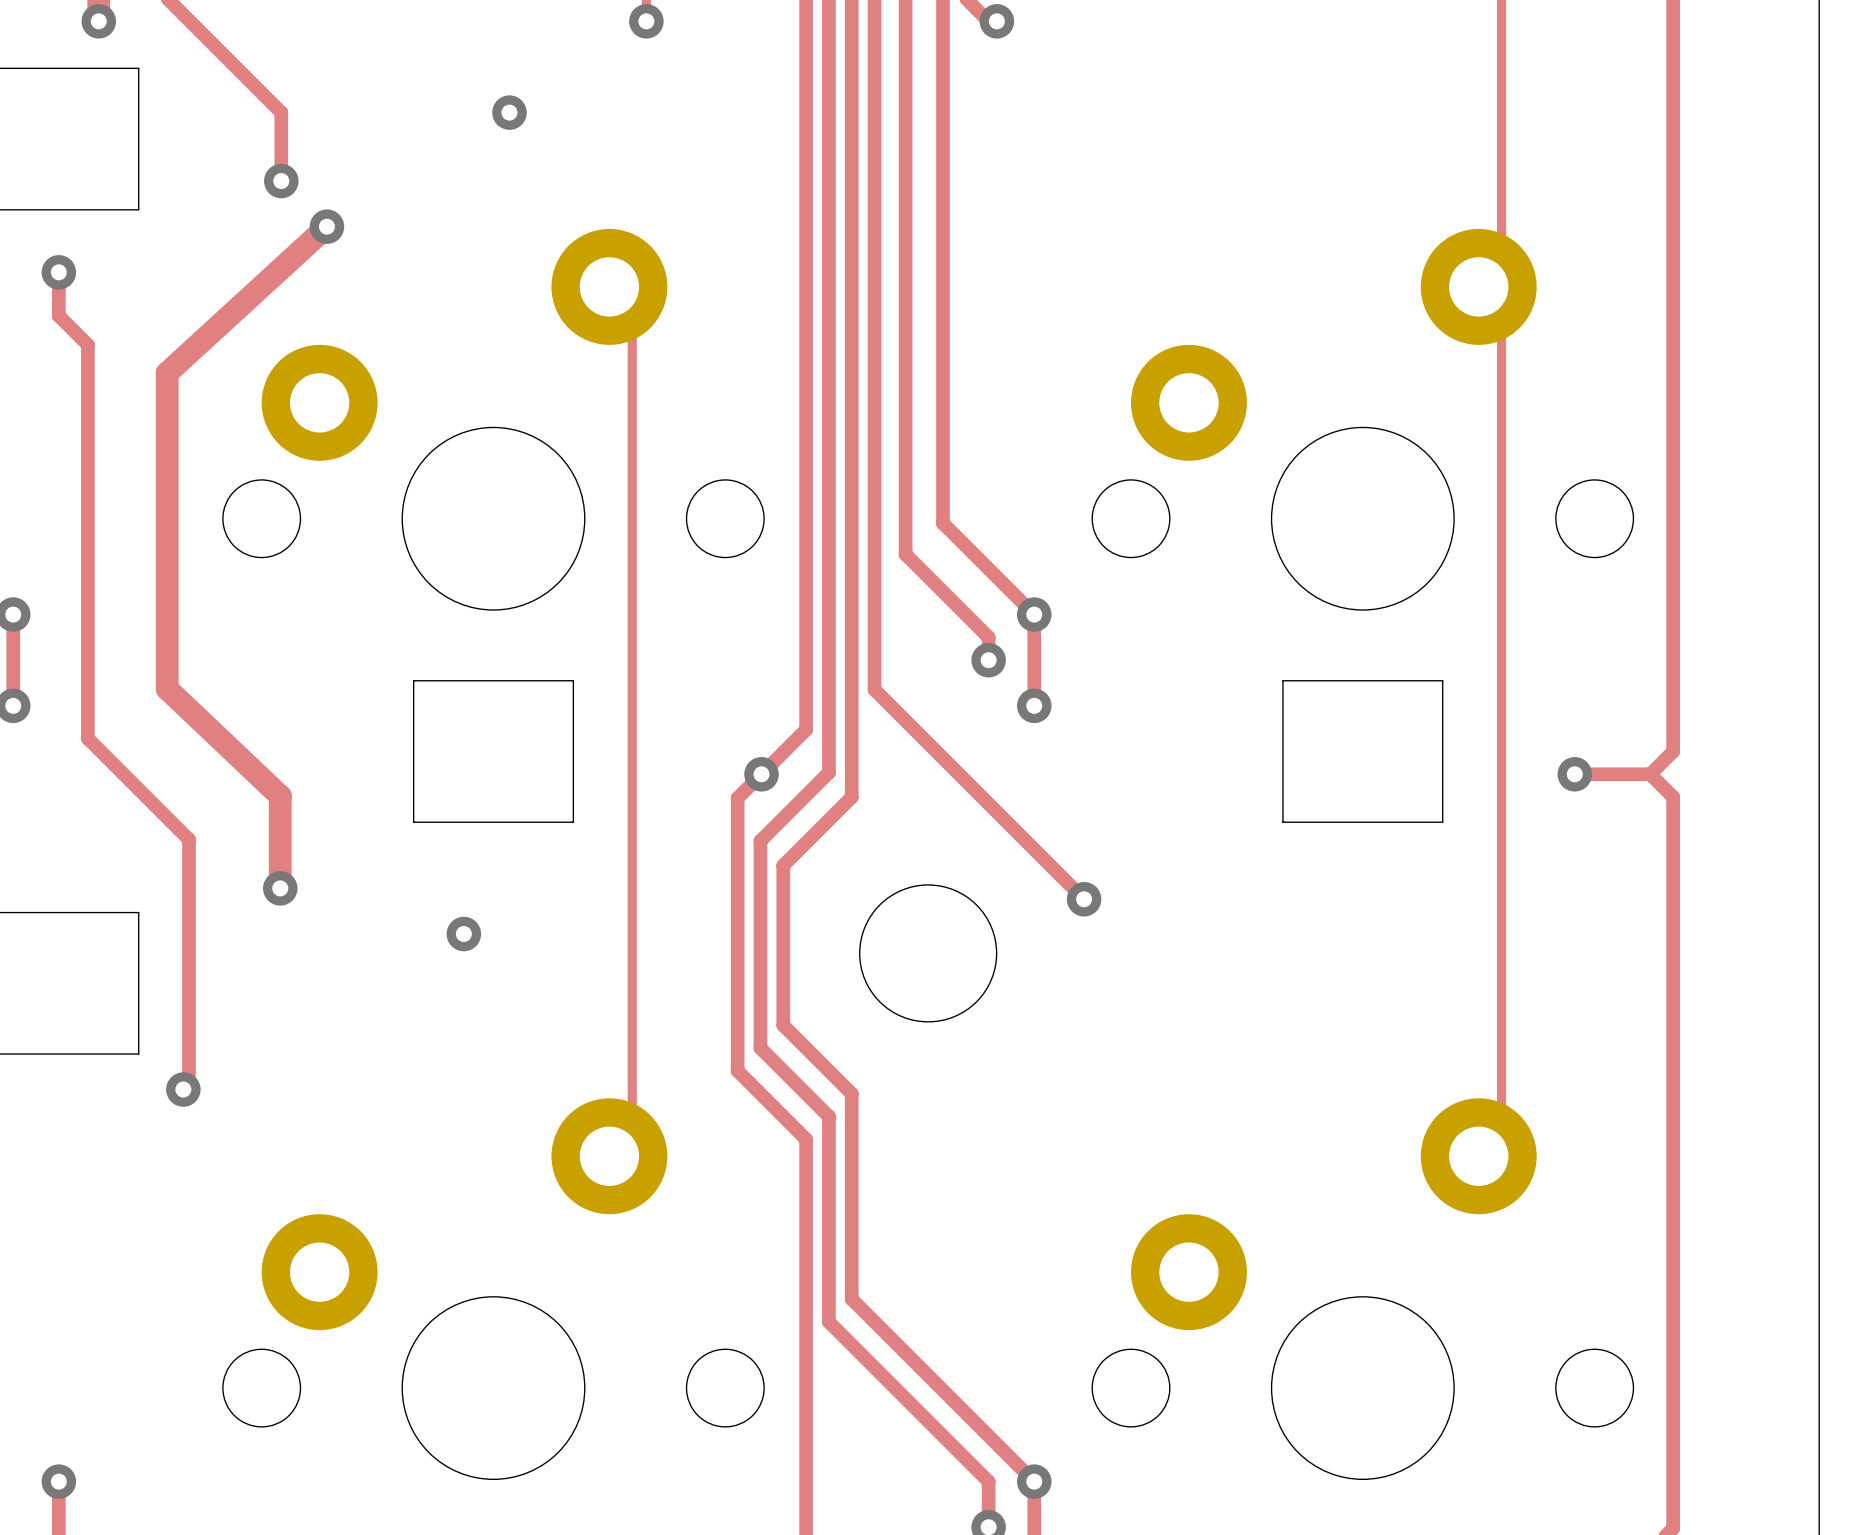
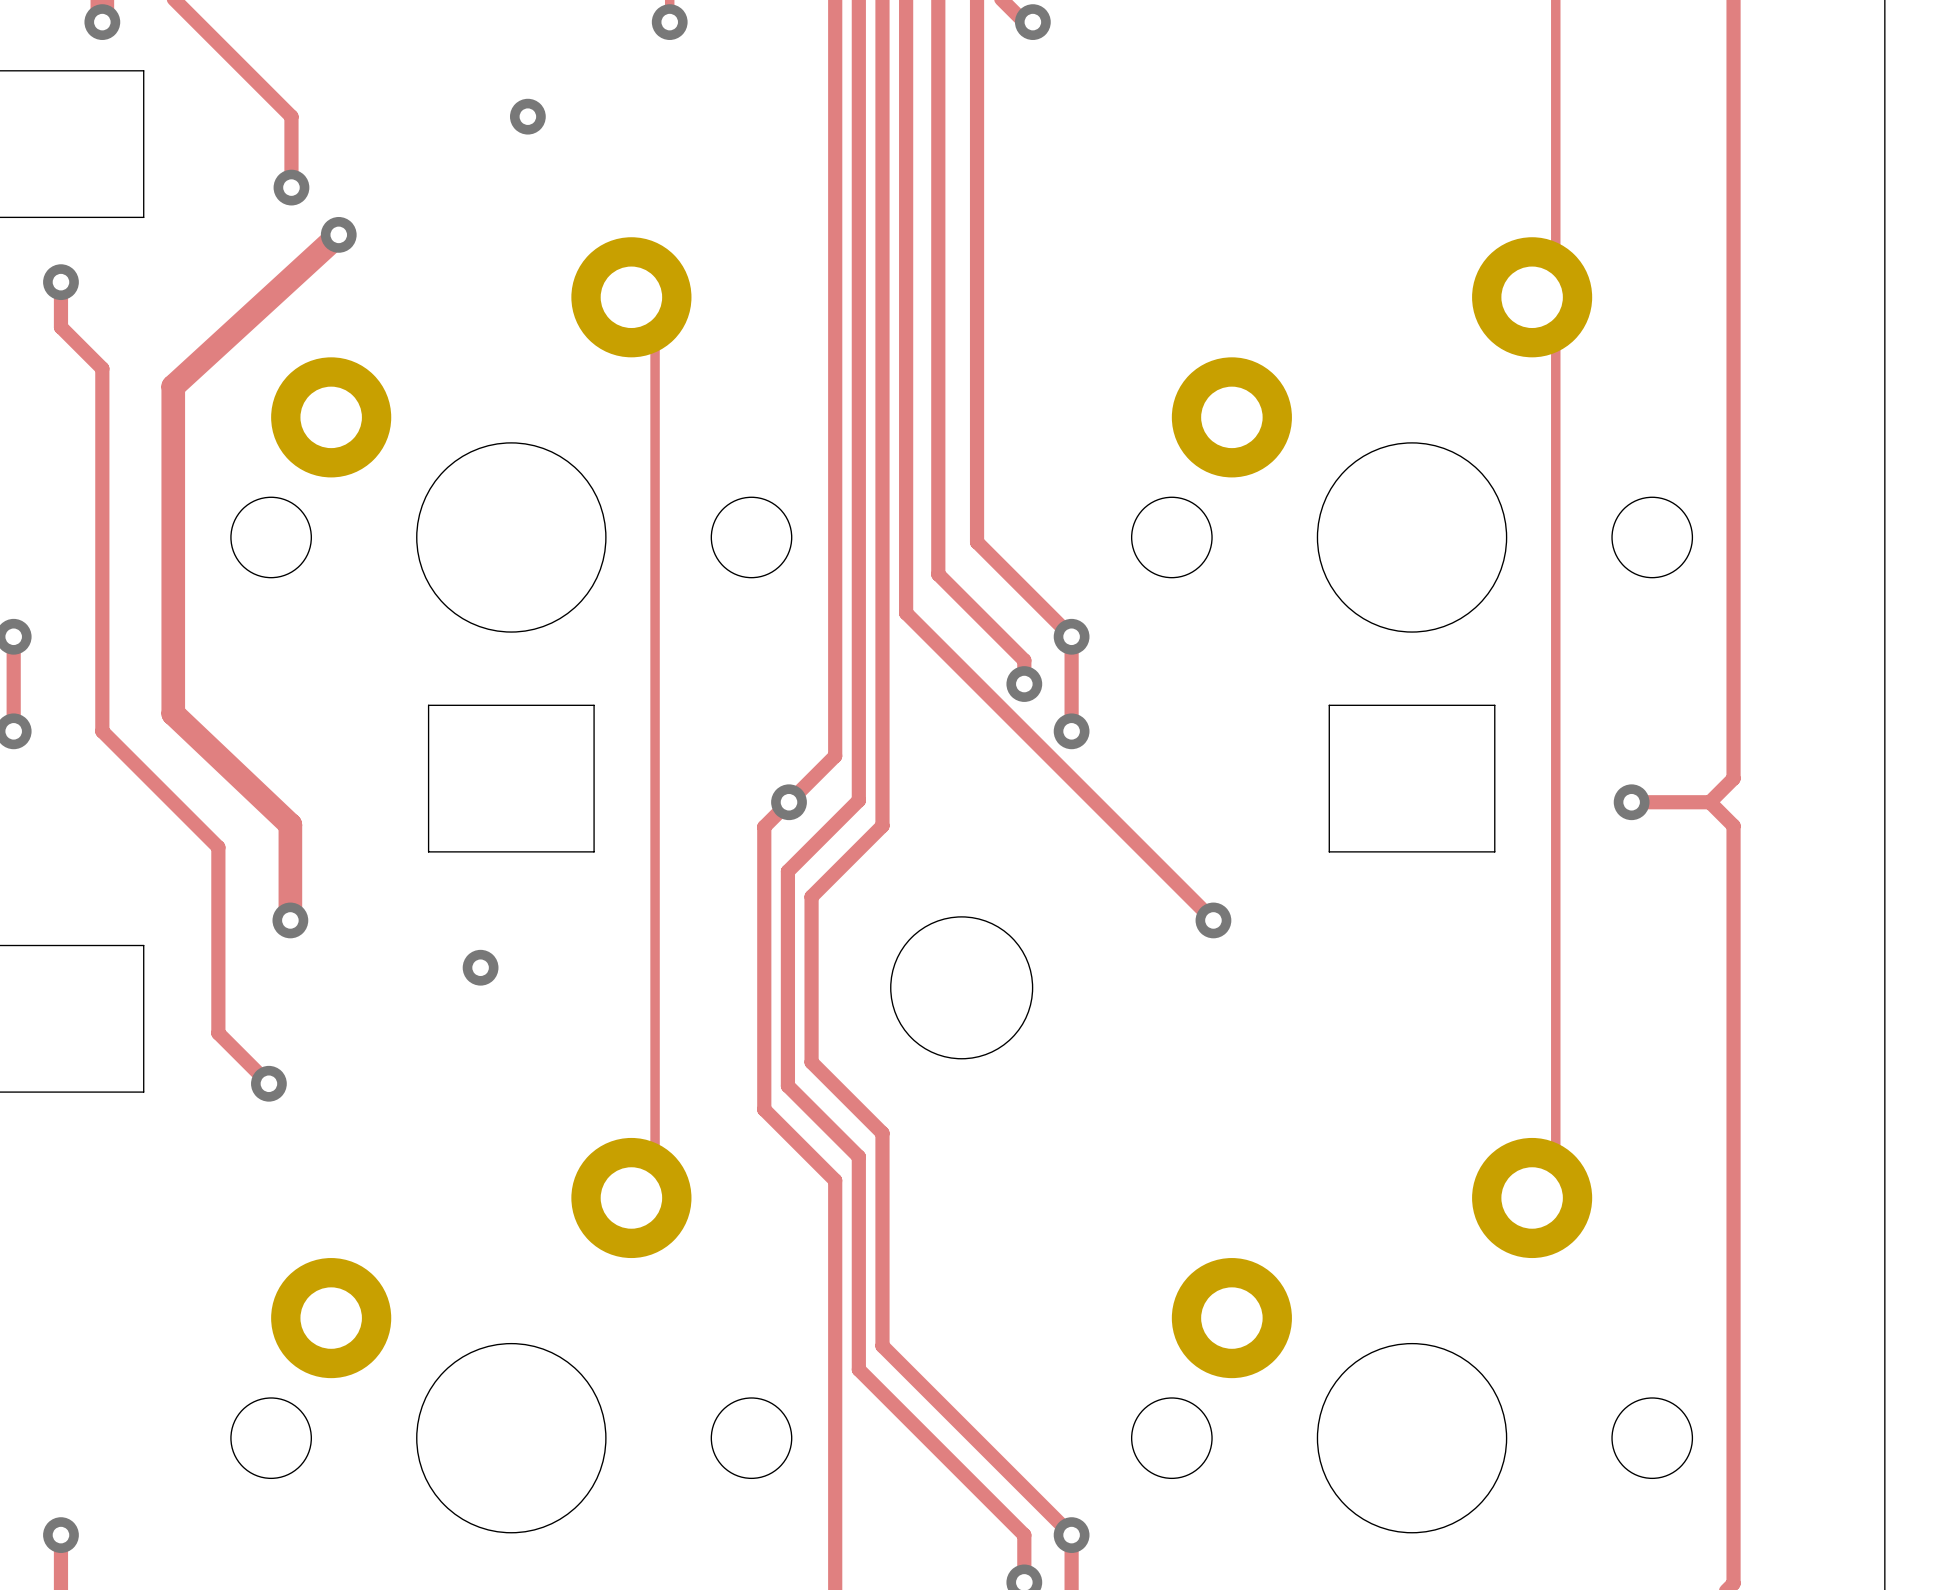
track: (87, 344) (87, 738) (188, 839) (188, 1083) (183, 1089) -> (91, 357) (102, 368) (102, 731) (218, 847) (218, 1033) (268, 1083)
track: (874, 591) (874, 689) (1084, 899) -> (906, 613) (1213, 920)
via position: (1084, 899) -> (1213, 920)
via position: (183, 1089) -> (268, 1083)

